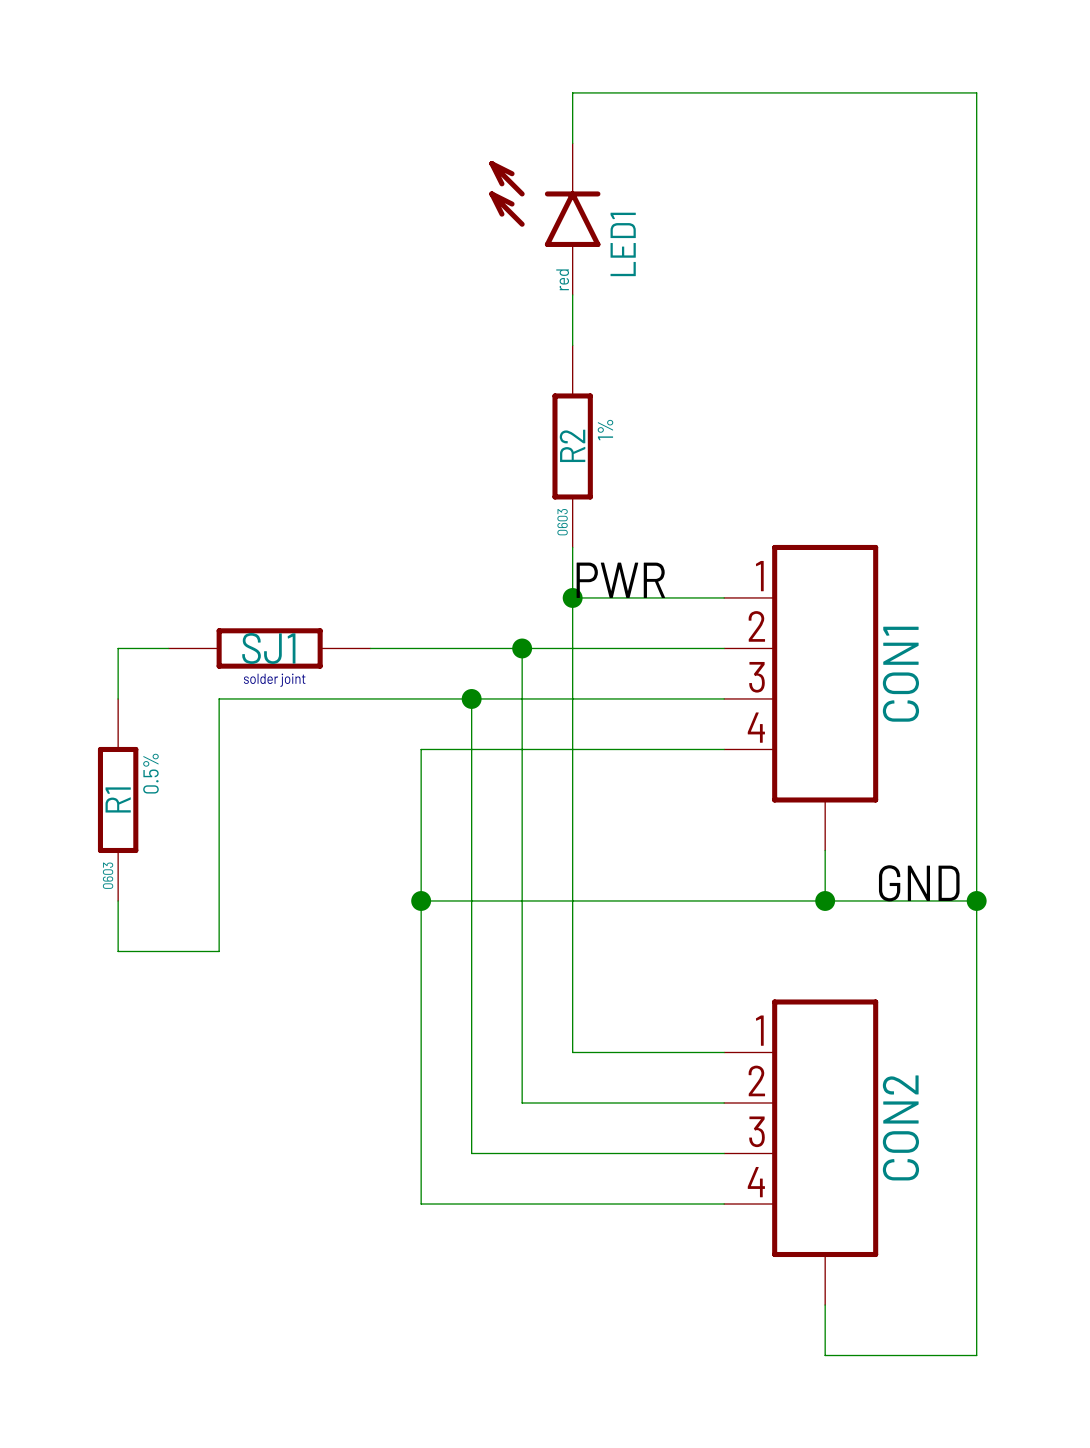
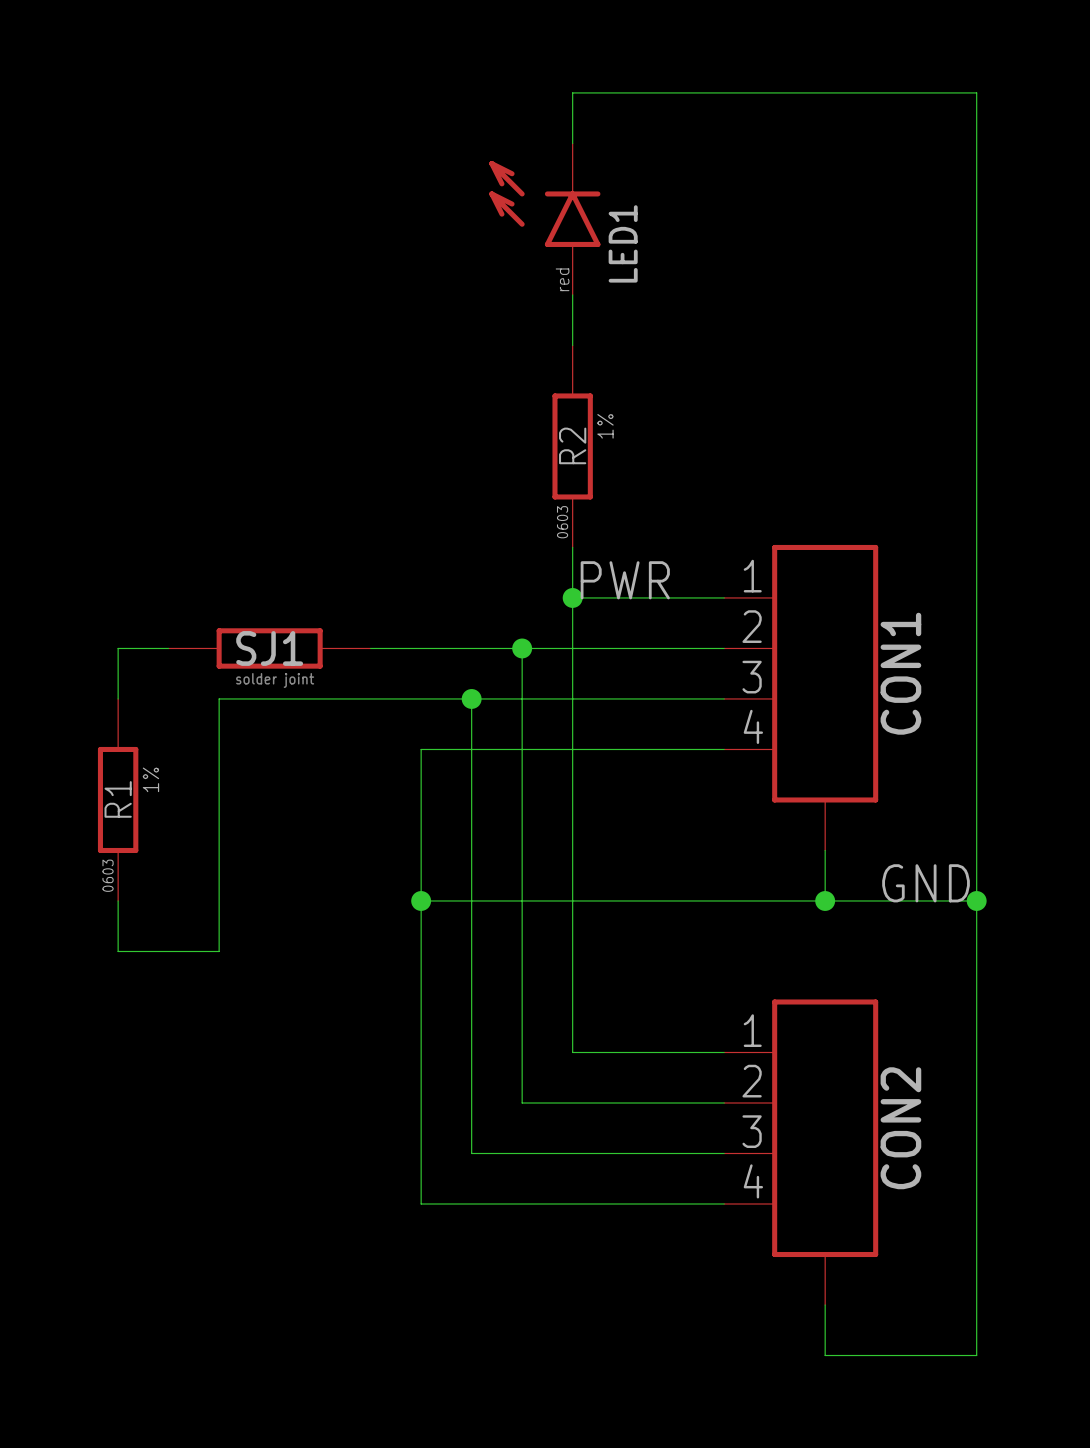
R1 text: 0.5% (150, 773) -> 1% (150, 779)

